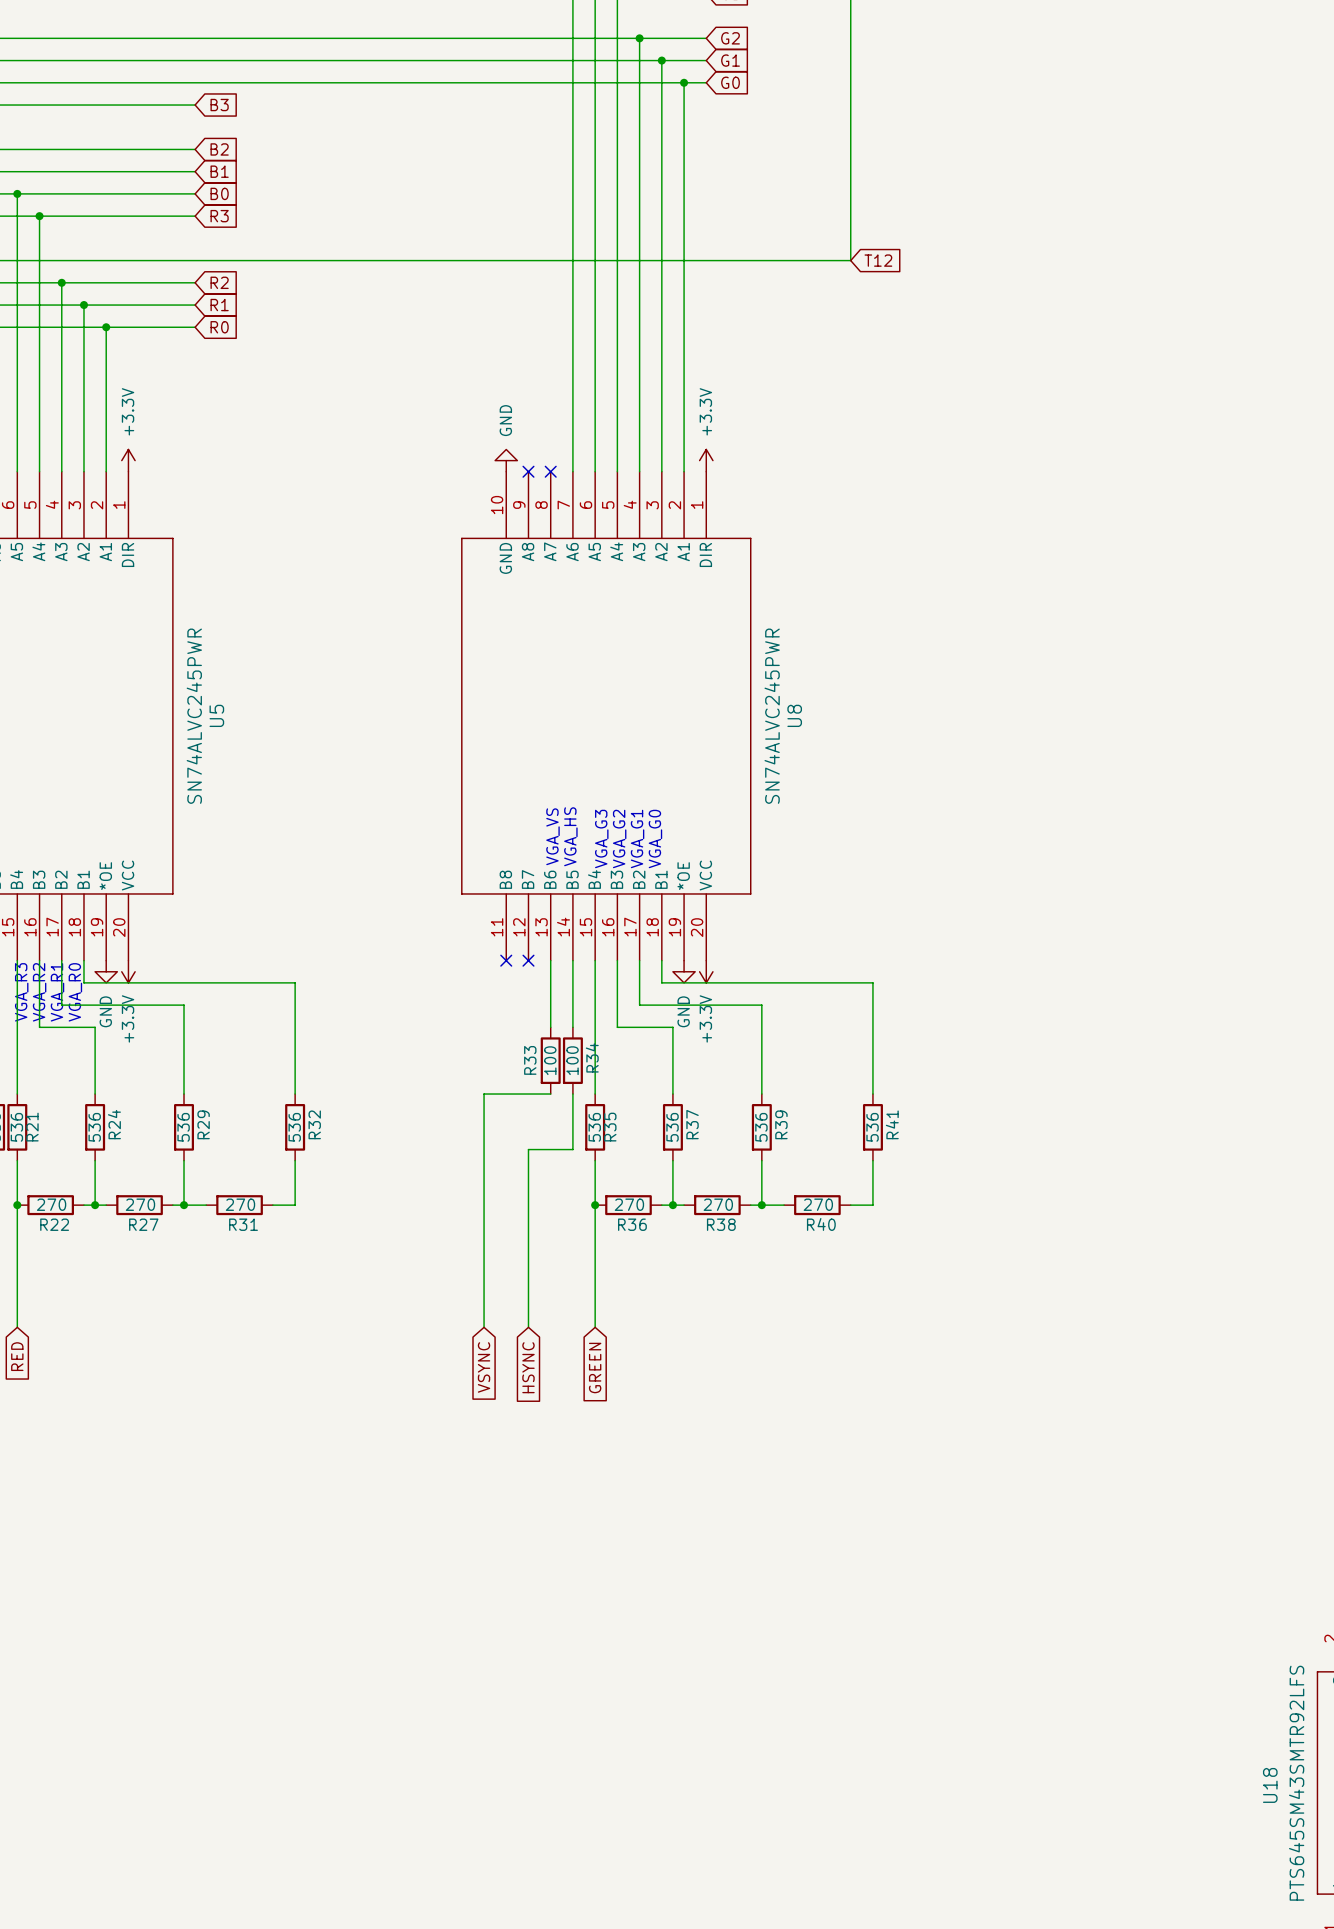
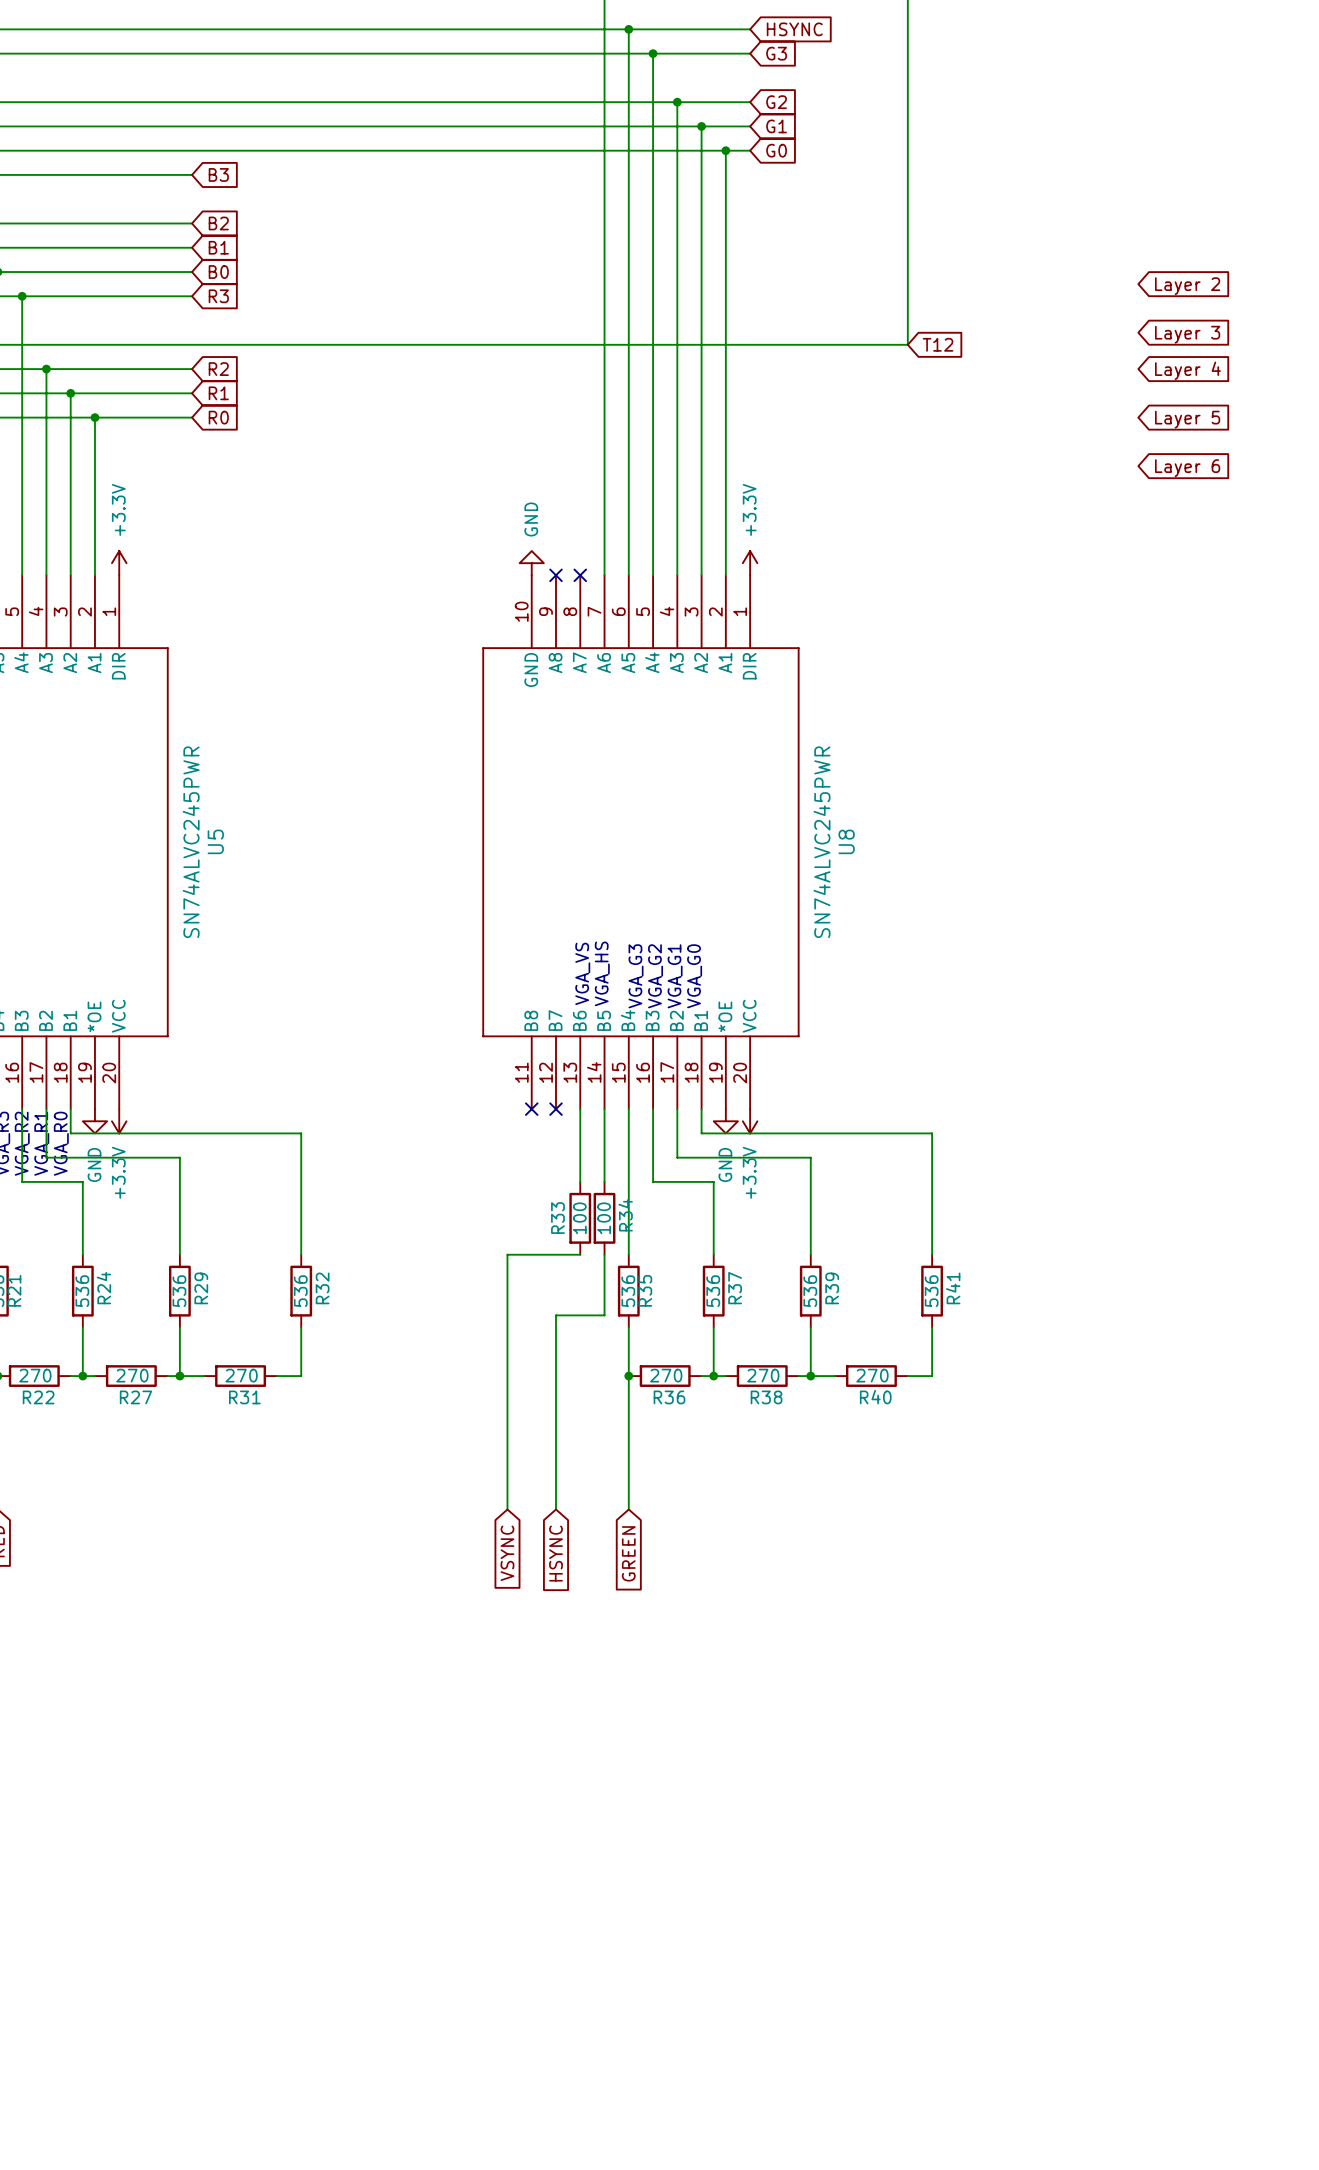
global label: none -> Layer 2 (1187, 286)
global label: none -> Layer 3 (1187, 334)
global label: none -> Layer 4 (1187, 370)
global label: none -> Layer 5 (1187, 419)
global label: none -> Layer 6 (1187, 468)

